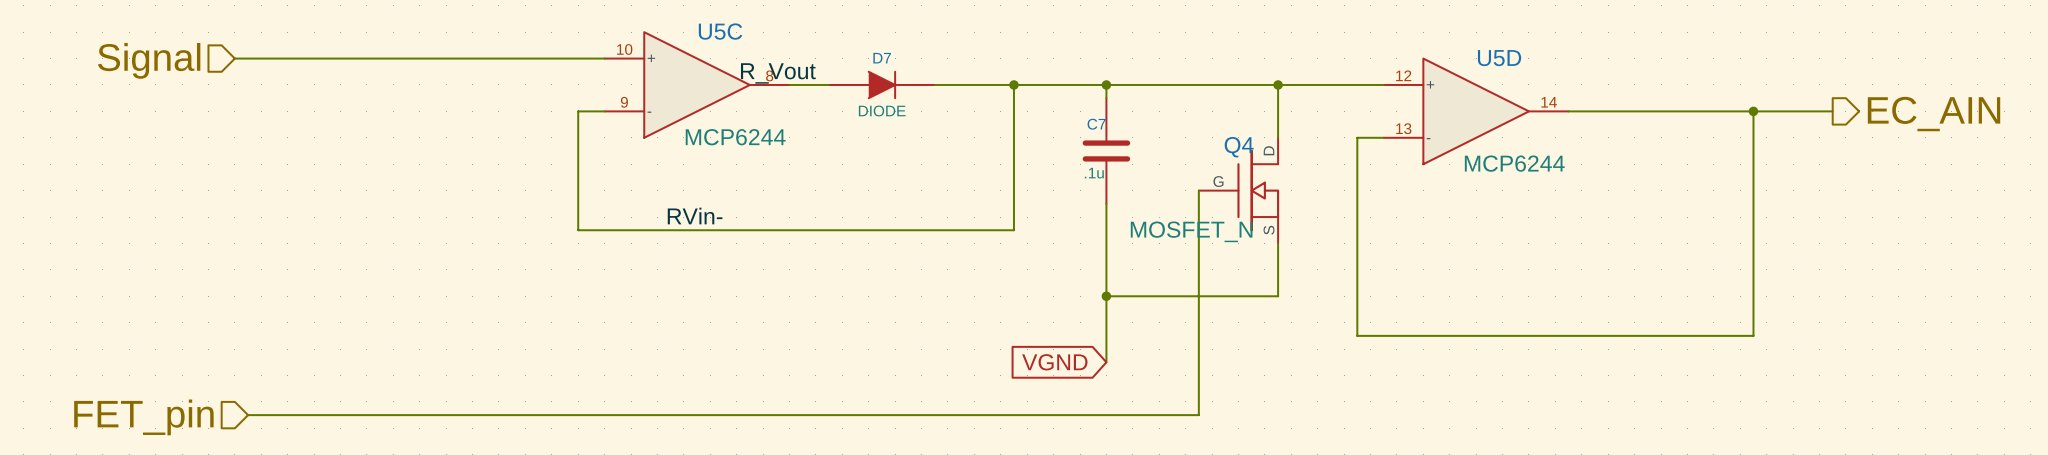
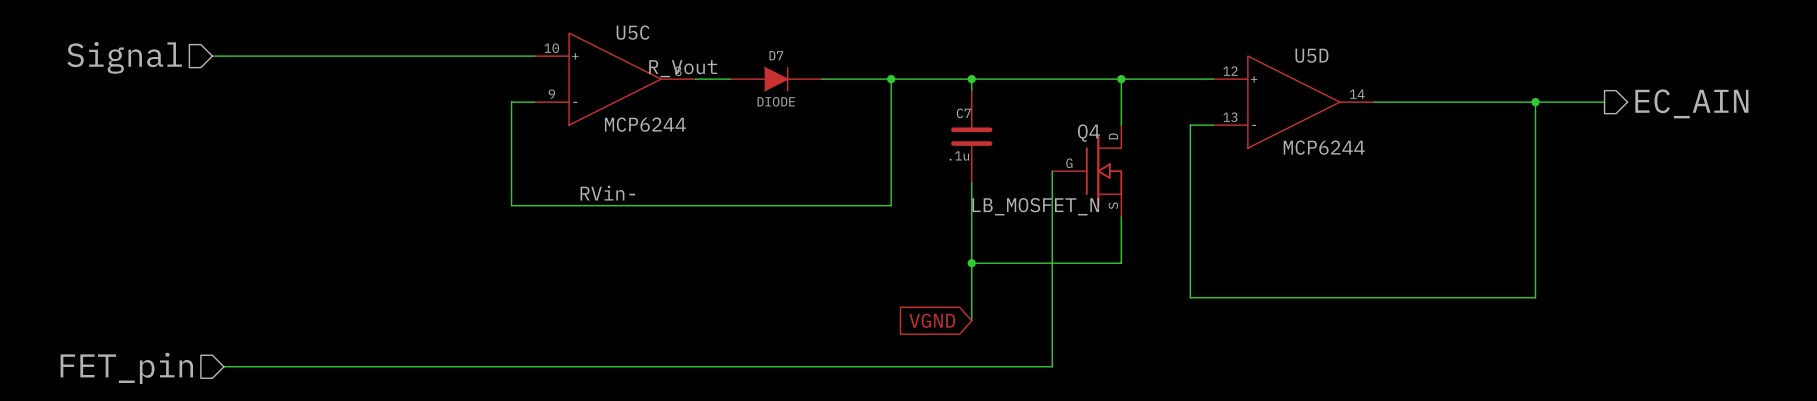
Q4 value: MOSFET_N (1191, 231) -> LB_MOSFET_N (1035, 206)

